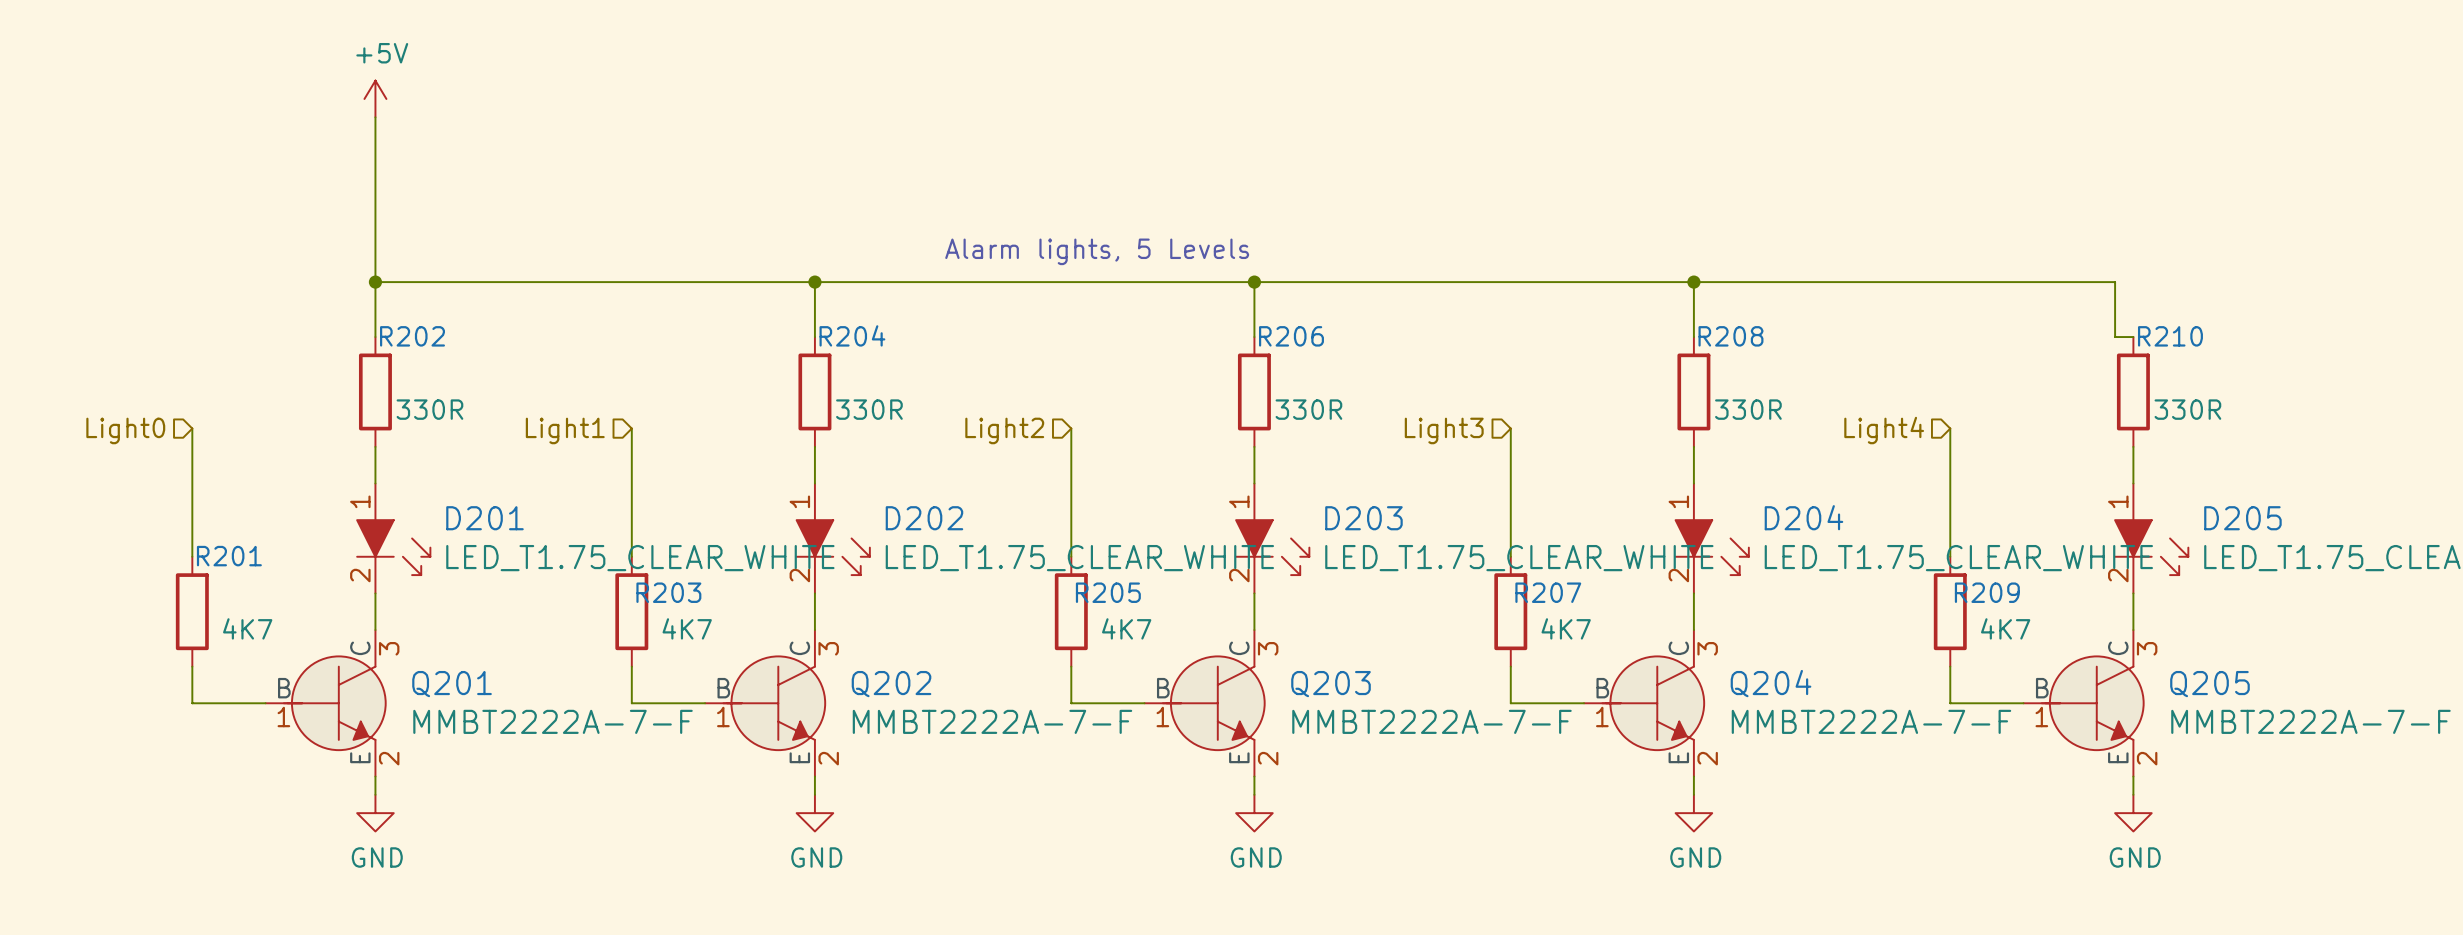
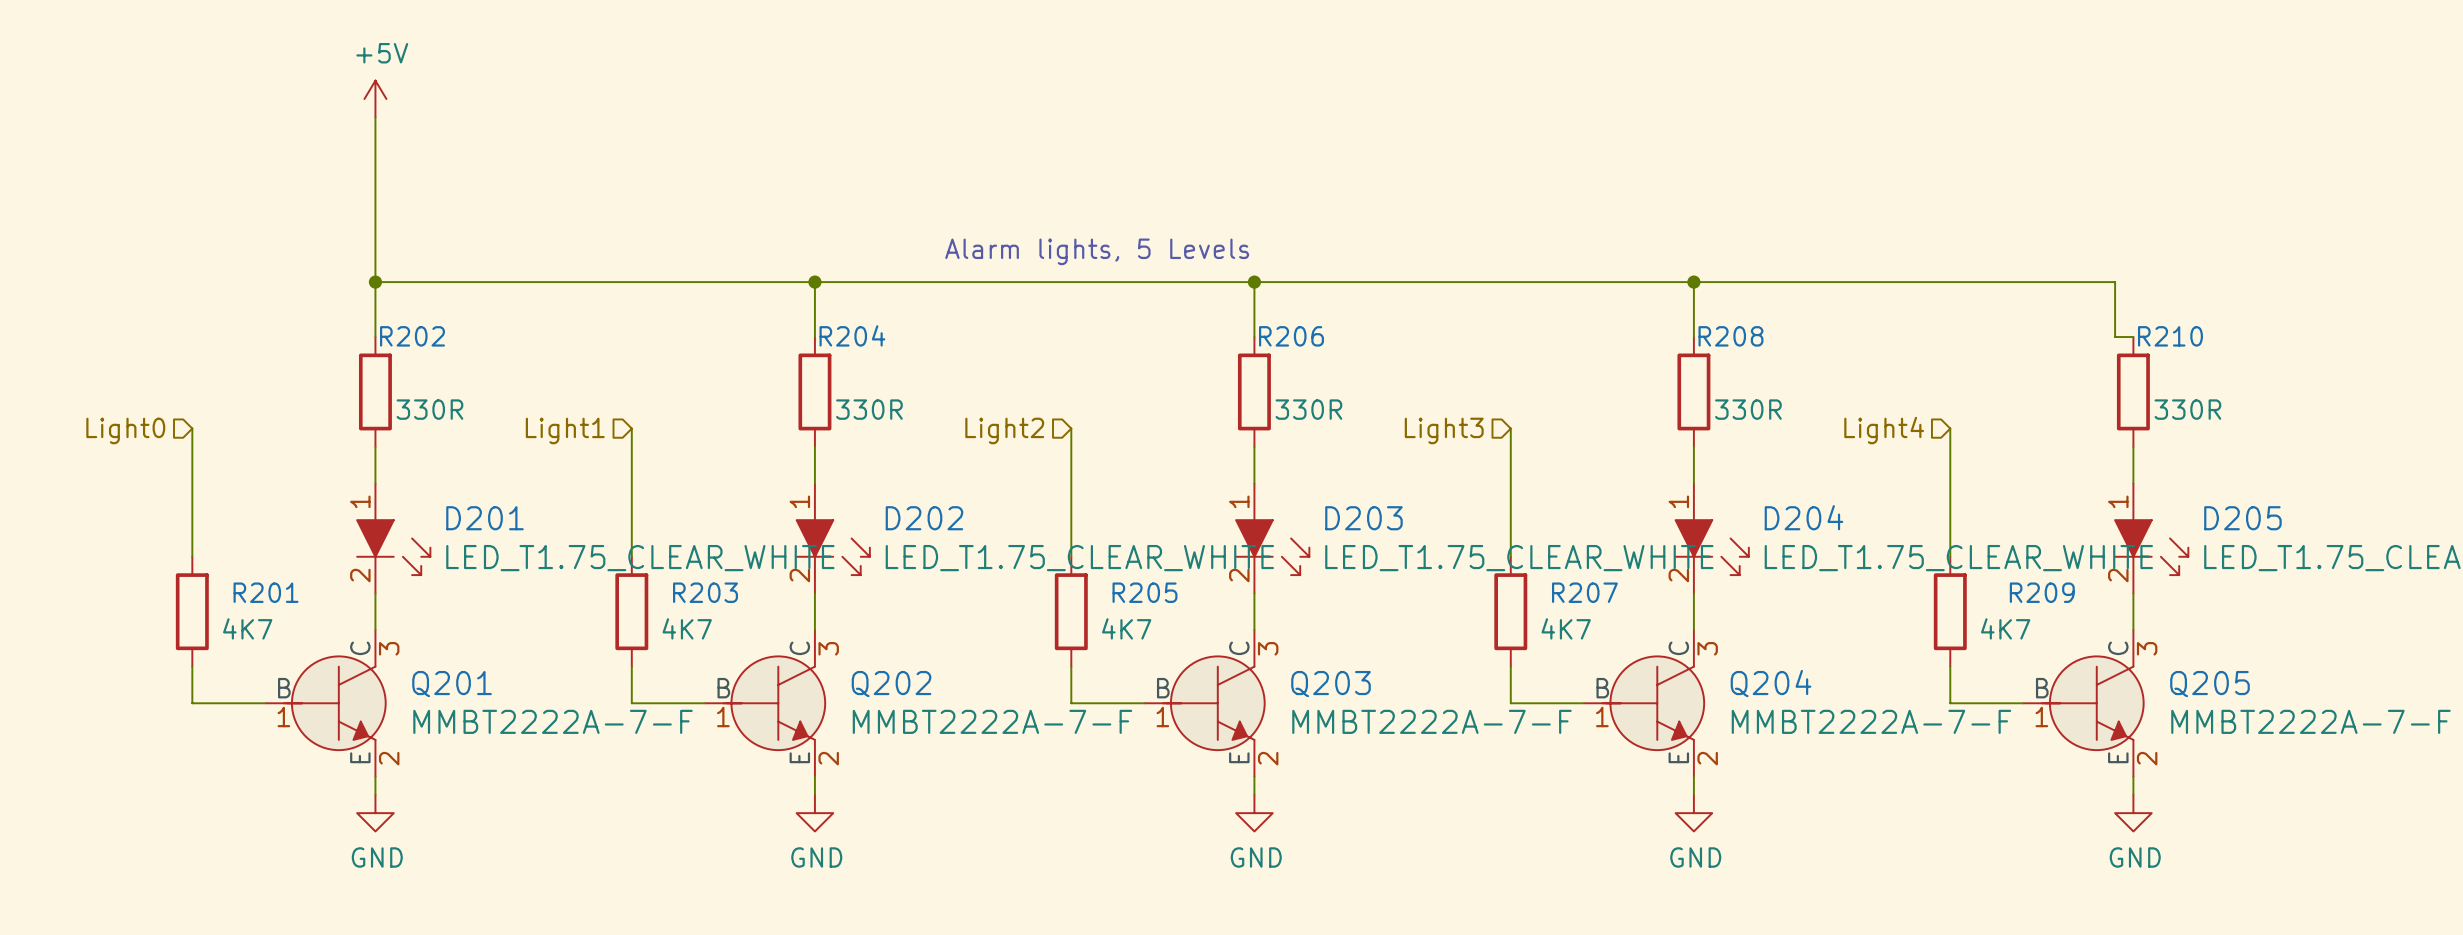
R201 name position: R201 (229, 556) -> R201 (266, 592)
R203 name position: R203 (668, 592) -> R203 (705, 592)
R205 name position: R205 (1108, 592) -> R205 (1144, 592)
R207 name position: R207 (1548, 592) -> R207 (1584, 592)
R209 name position: R209 (1987, 592) -> R209 (2042, 592)

